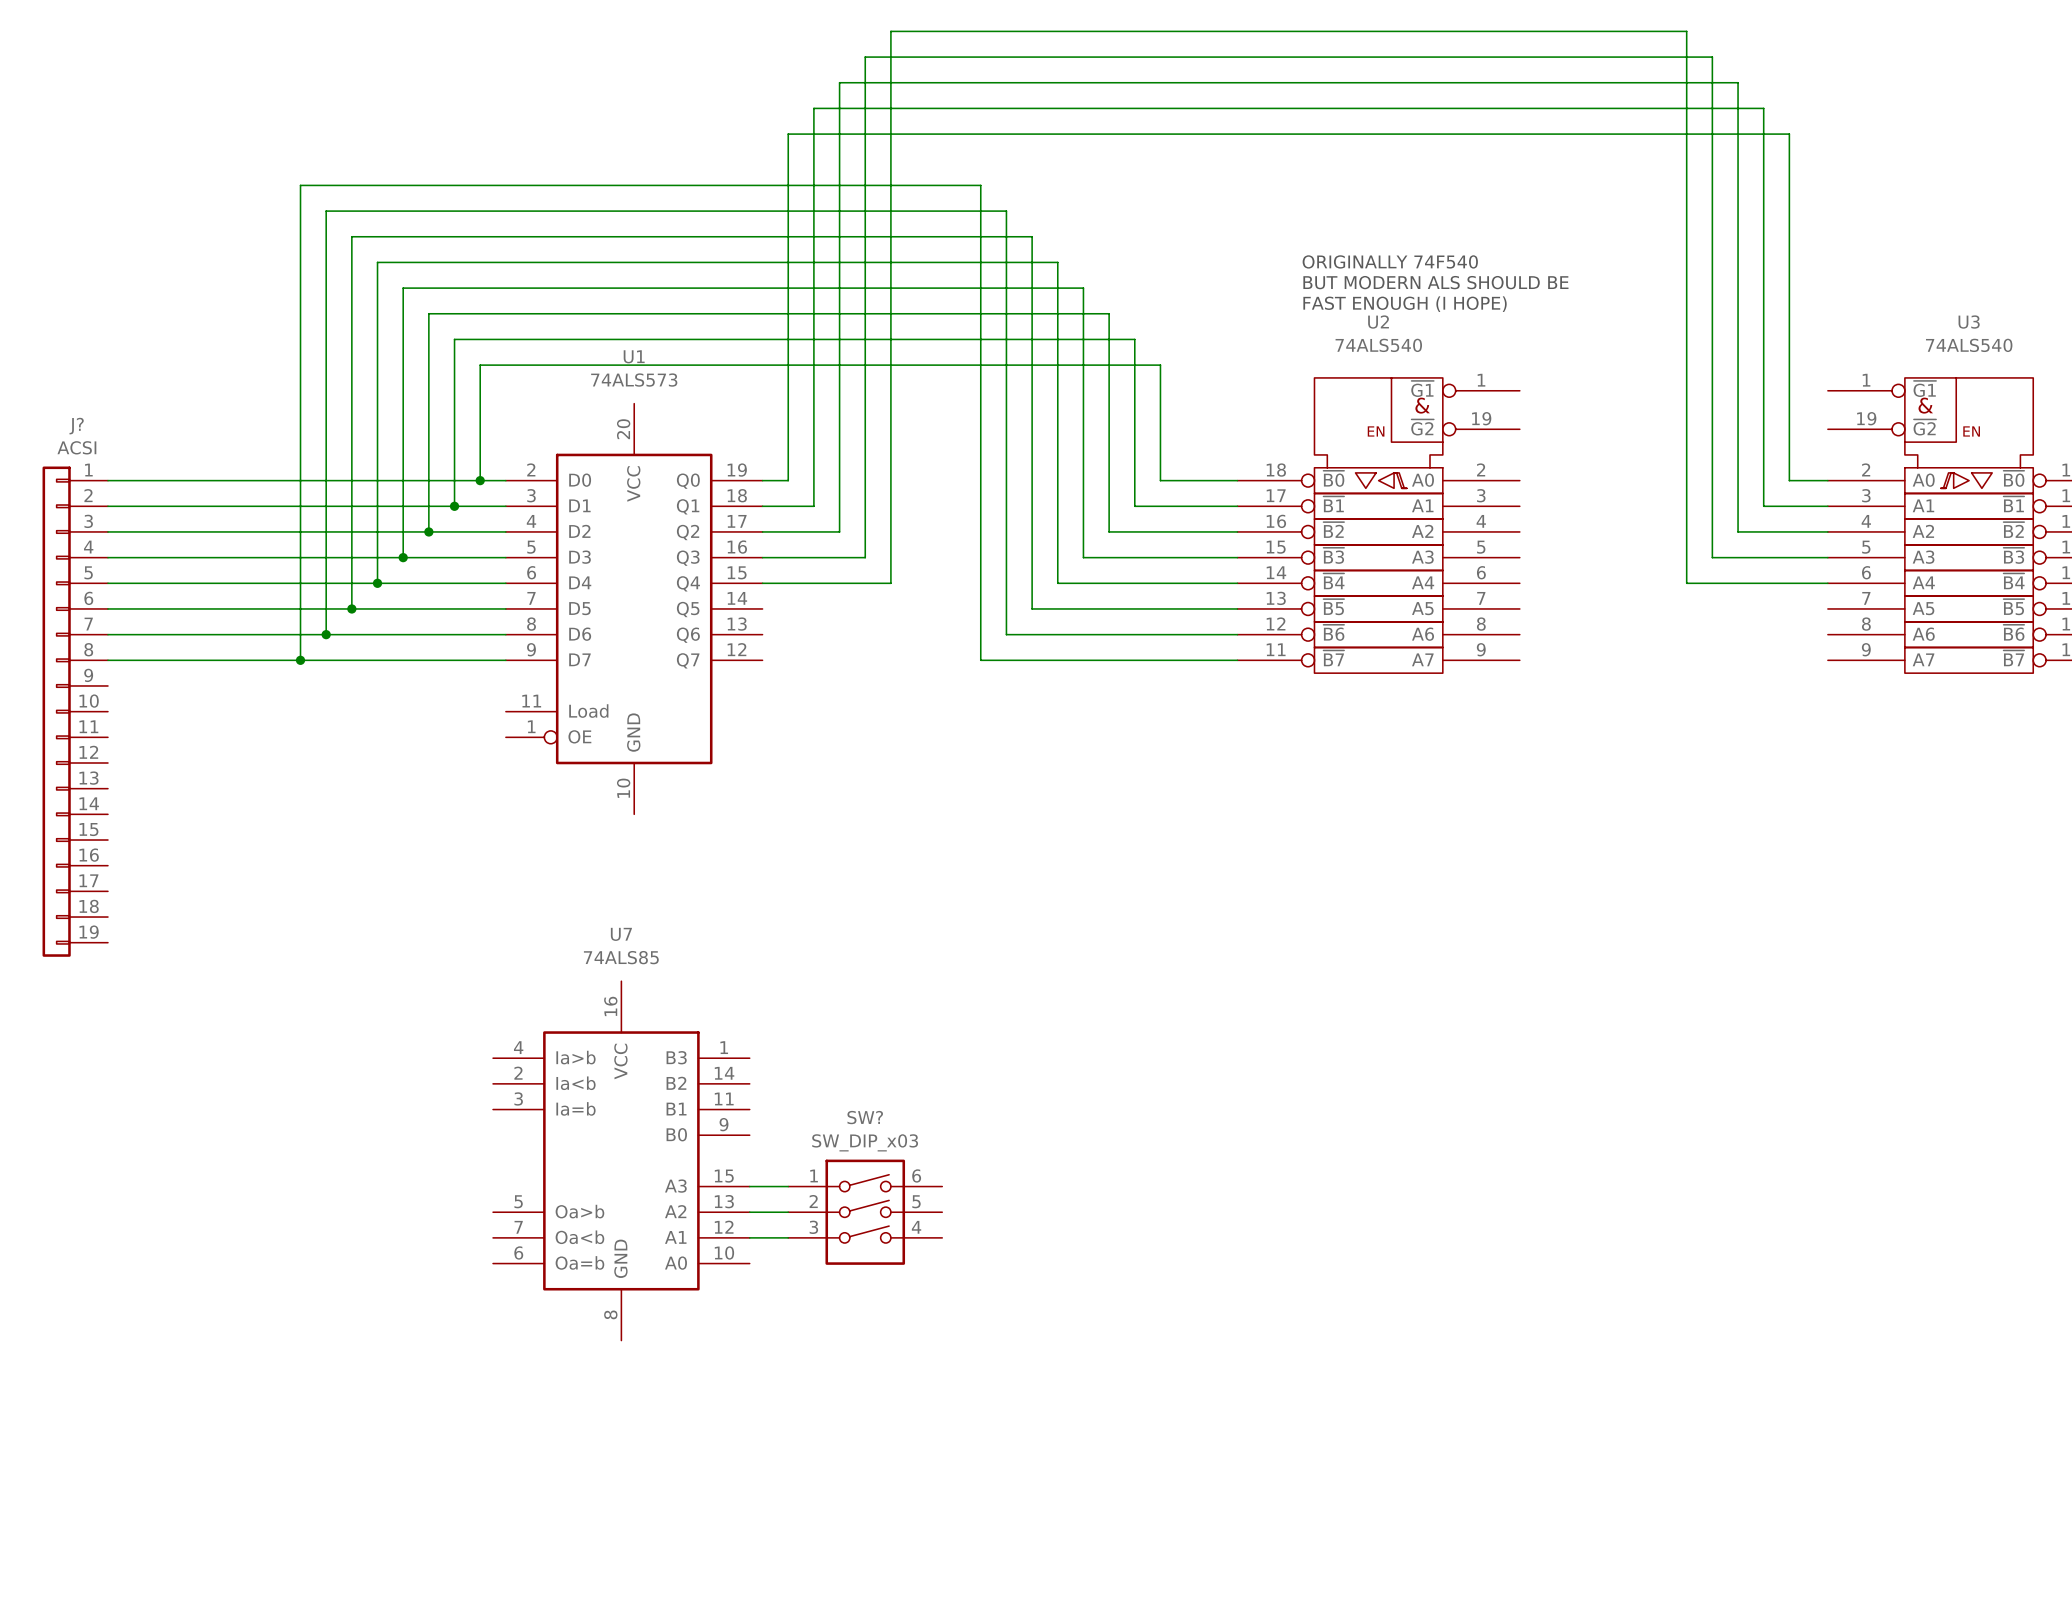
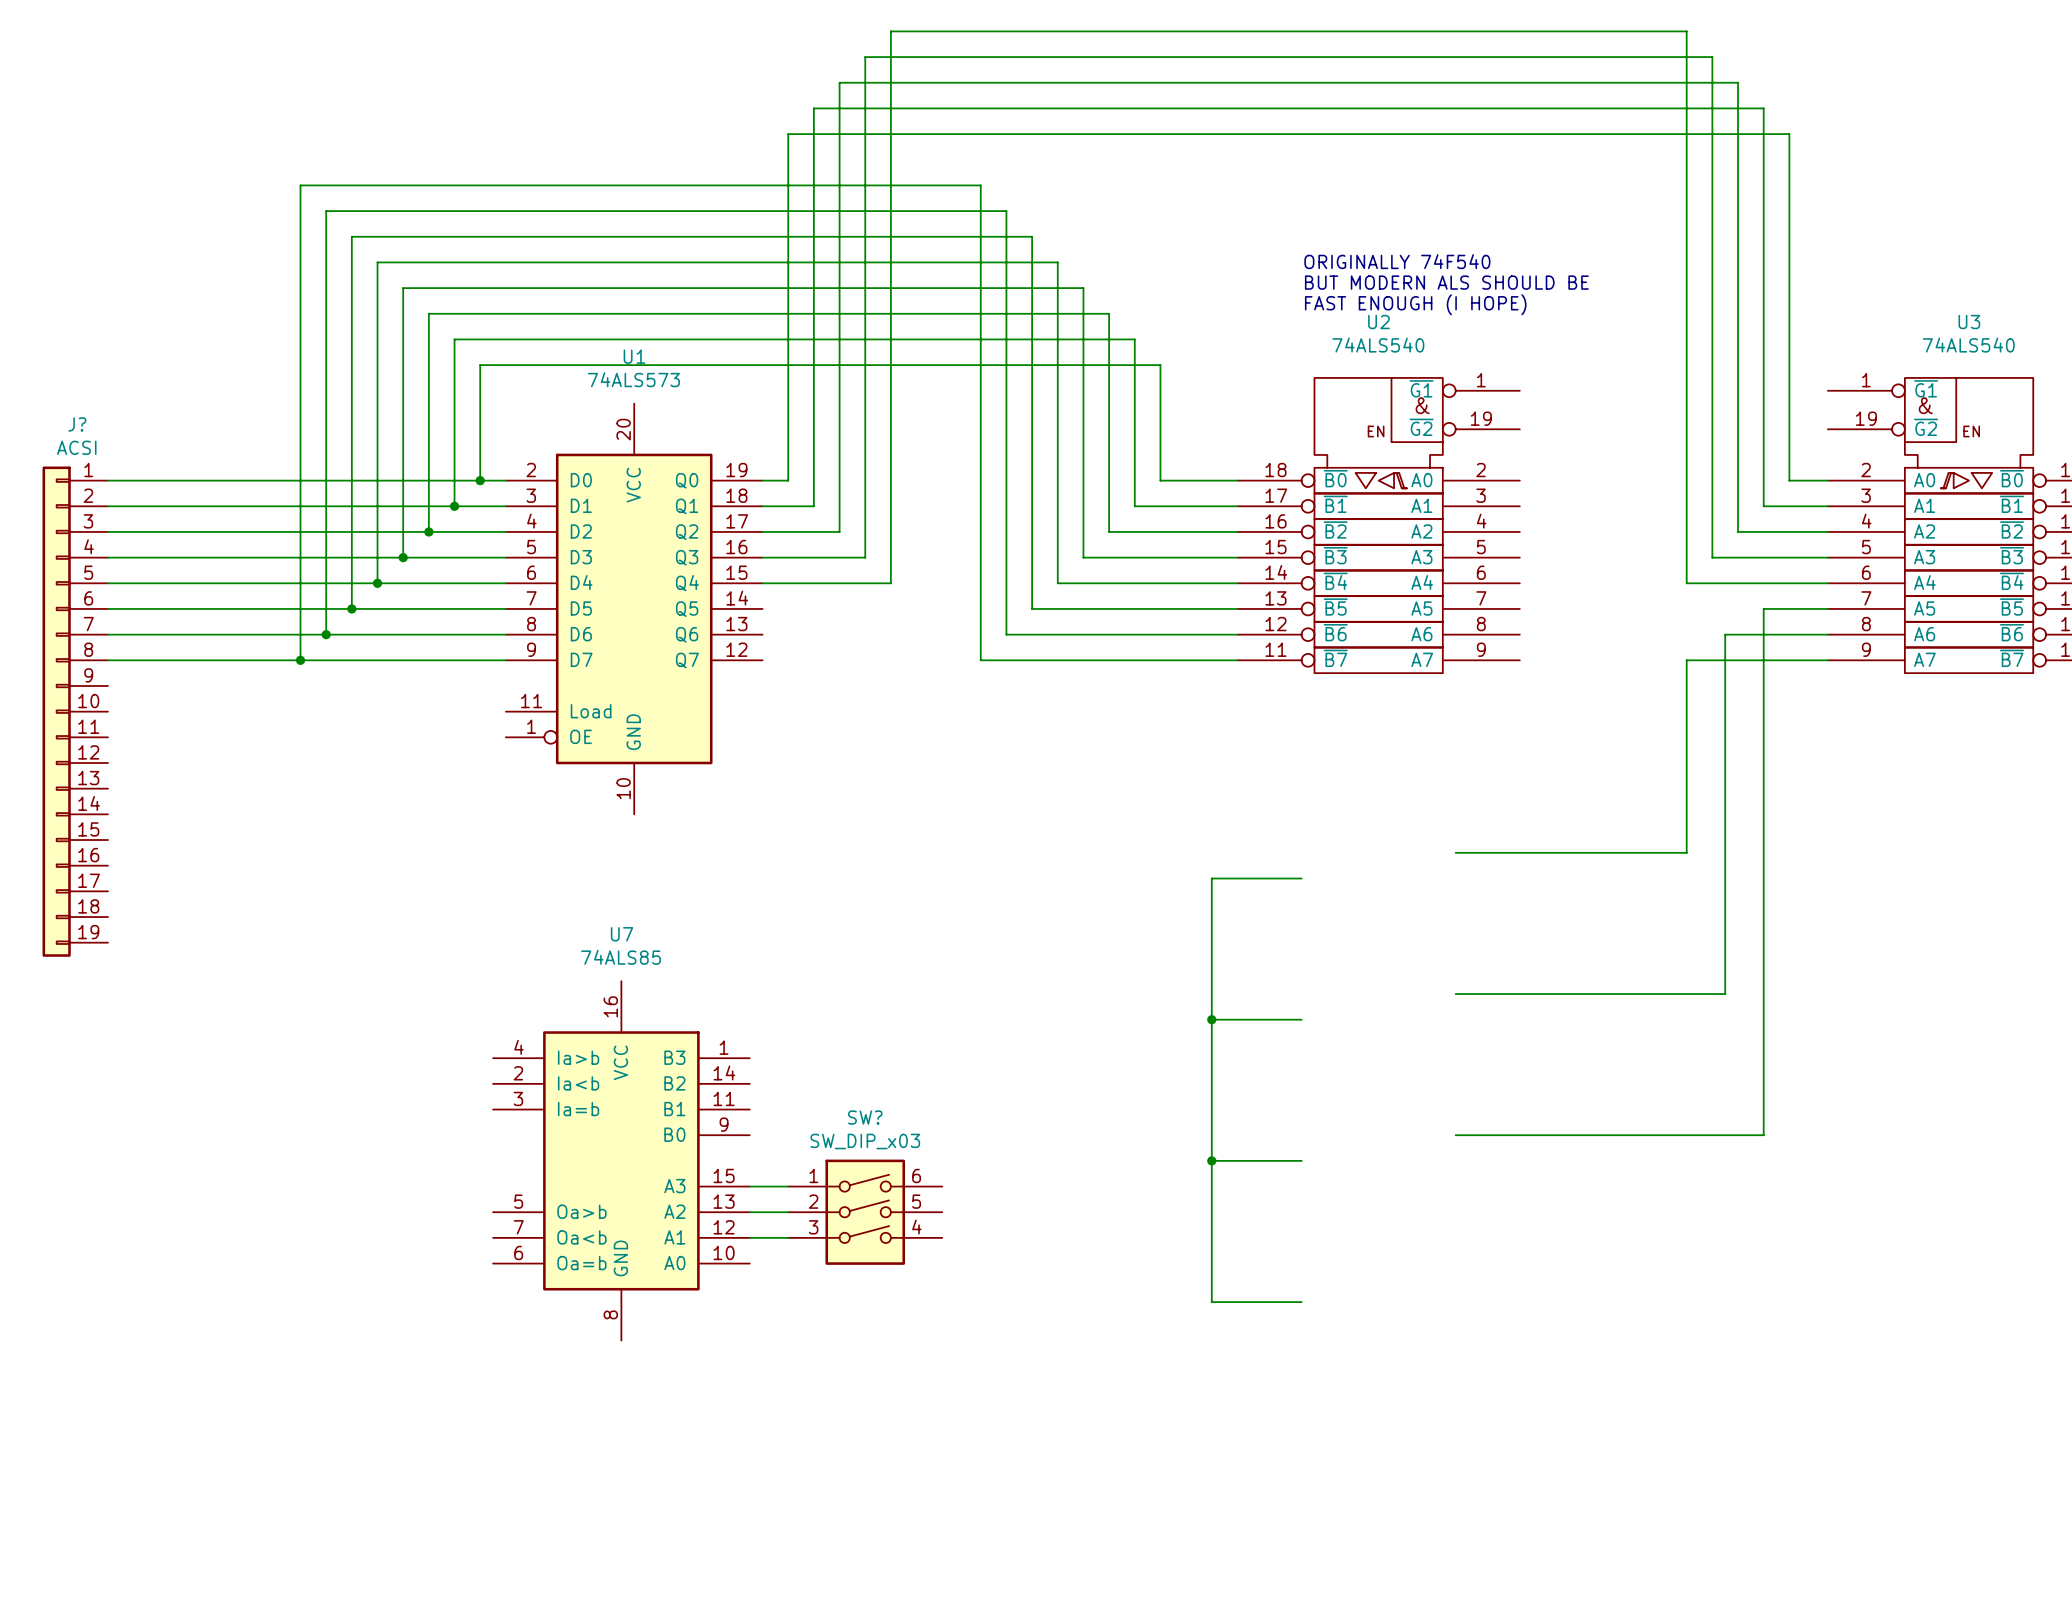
wire: none -> (1827, 608) (1763, 608) (1763, 1135) (1455, 1135)
wire: none -> (1827, 634) (1725, 634) (1725, 994) (1455, 994)
wire: none -> (1827, 660) (1686, 660) (1686, 852) (1455, 852)
wire: none -> (1301, 878) (1211, 878) (1211, 1302) (1301, 1302)
wire: none -> (1211, 1019) (1301, 1019)
junction: none -> (1211, 1019)
wire: none -> (1211, 1160) (1301, 1160)
junction: none -> (1211, 1160)

